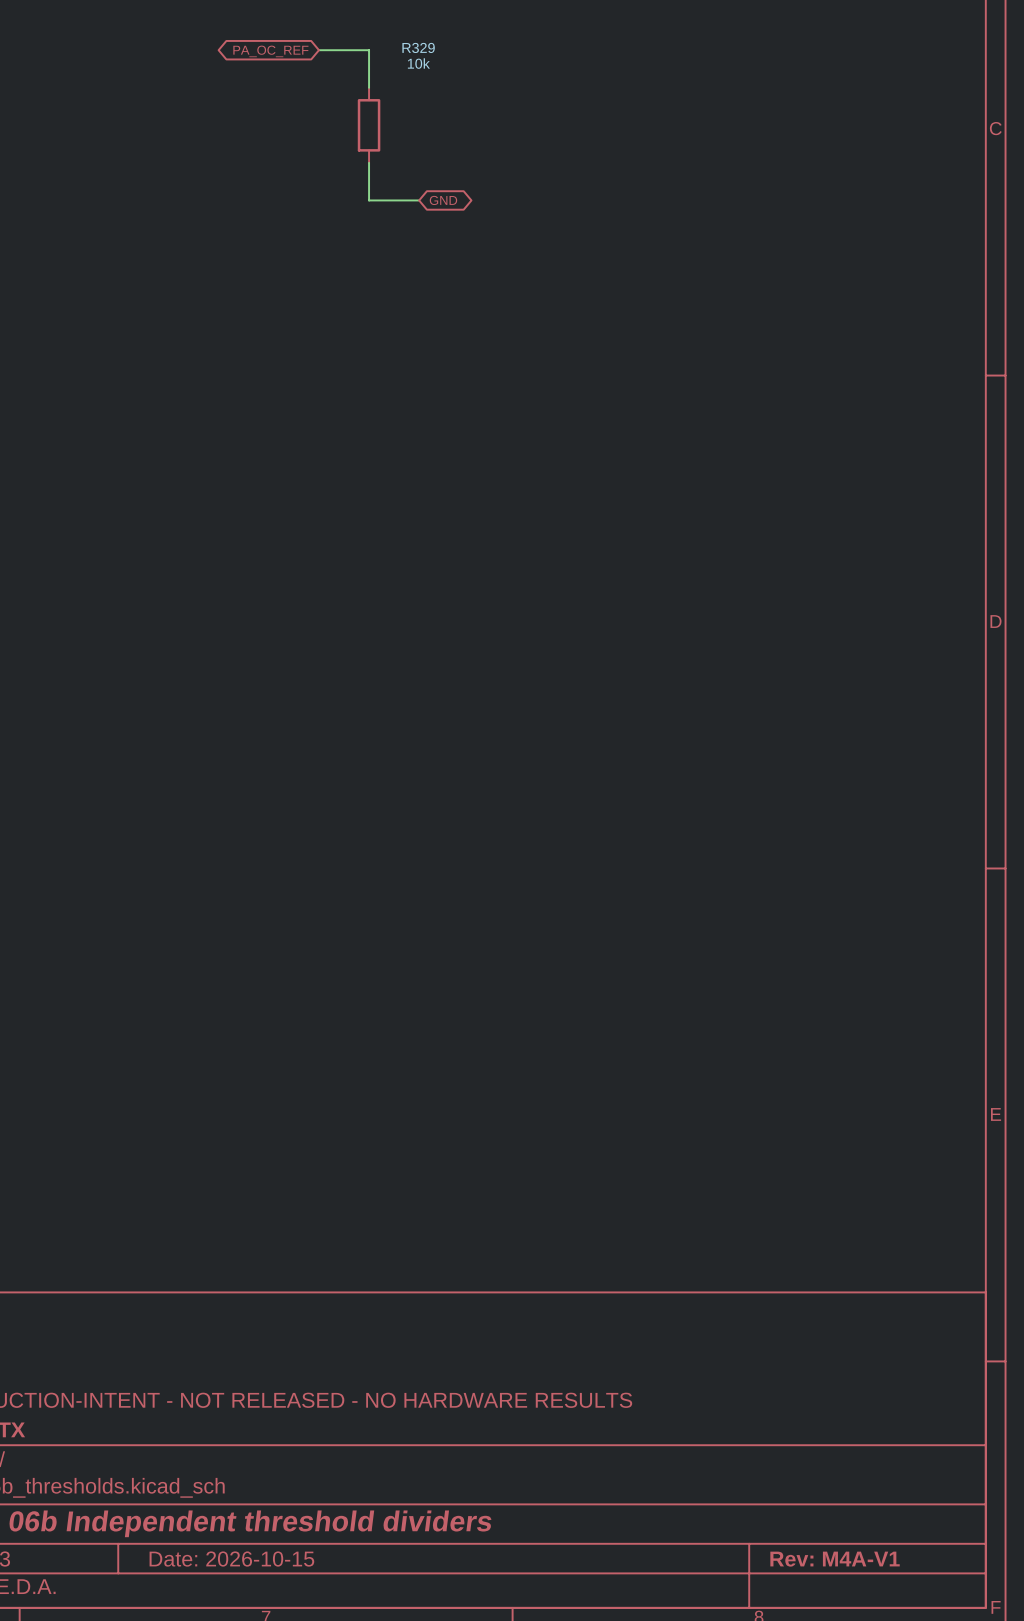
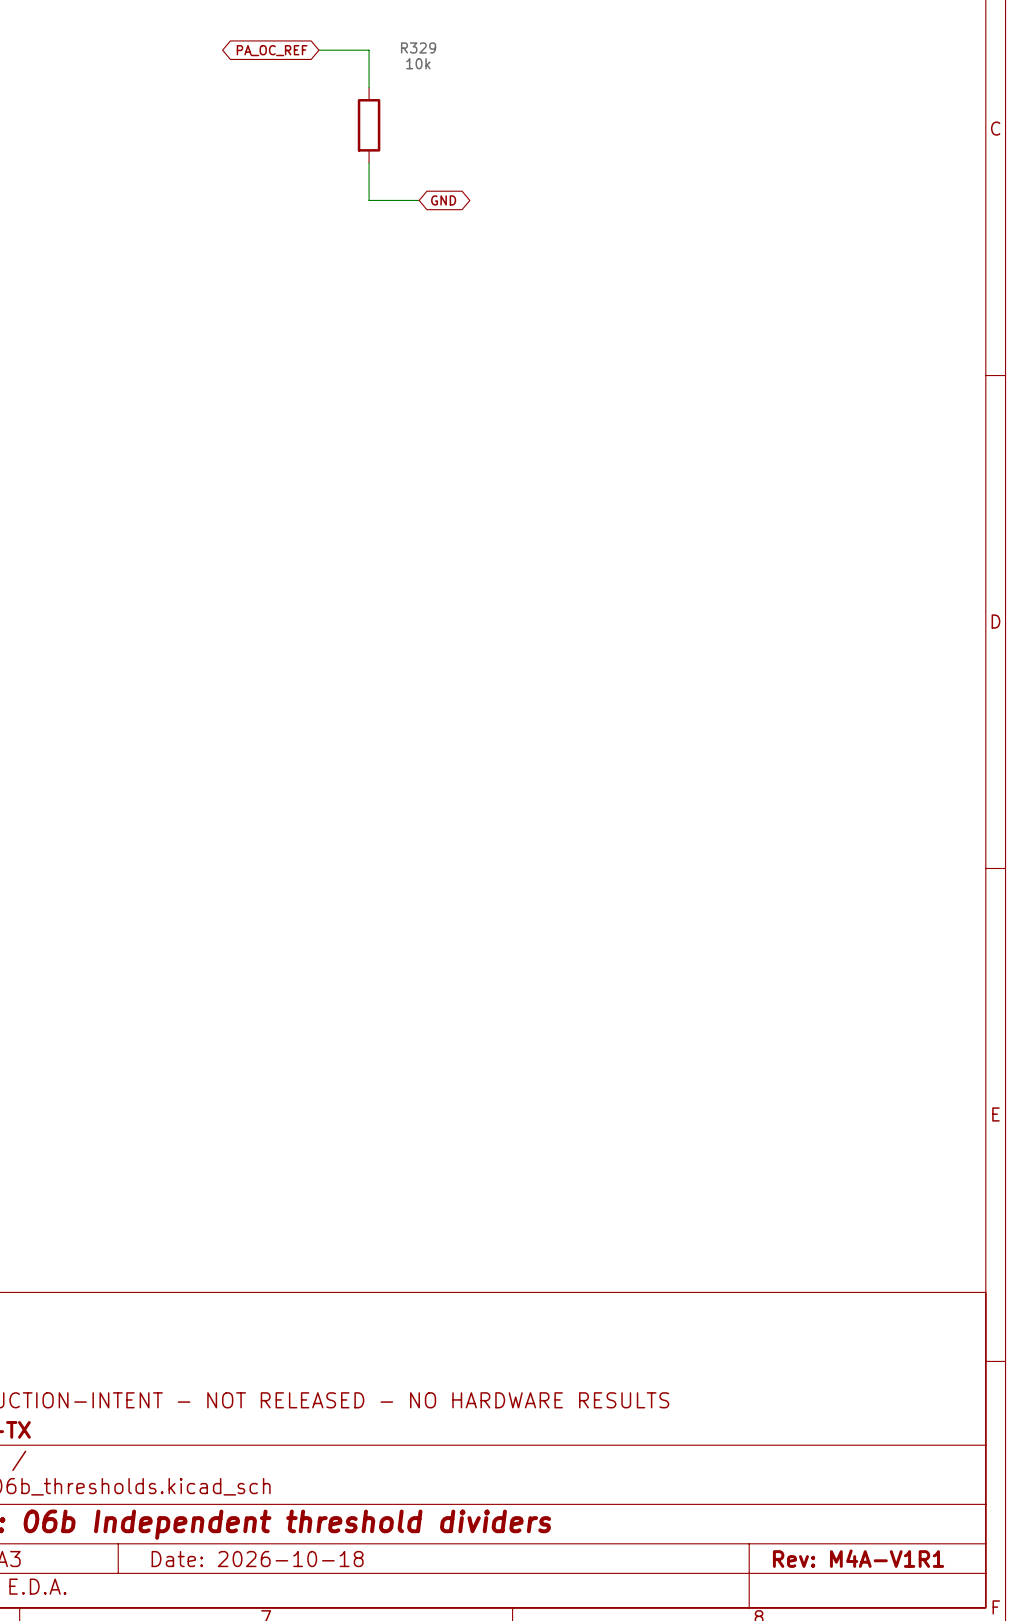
title block: Date: 2026-10-15 (231, 1559) -> Date: 2026-10-18 (257, 1559)
title block: Rev: M4A-V1 (835, 1559) -> Rev: M4A-V1R1 (858, 1558)

